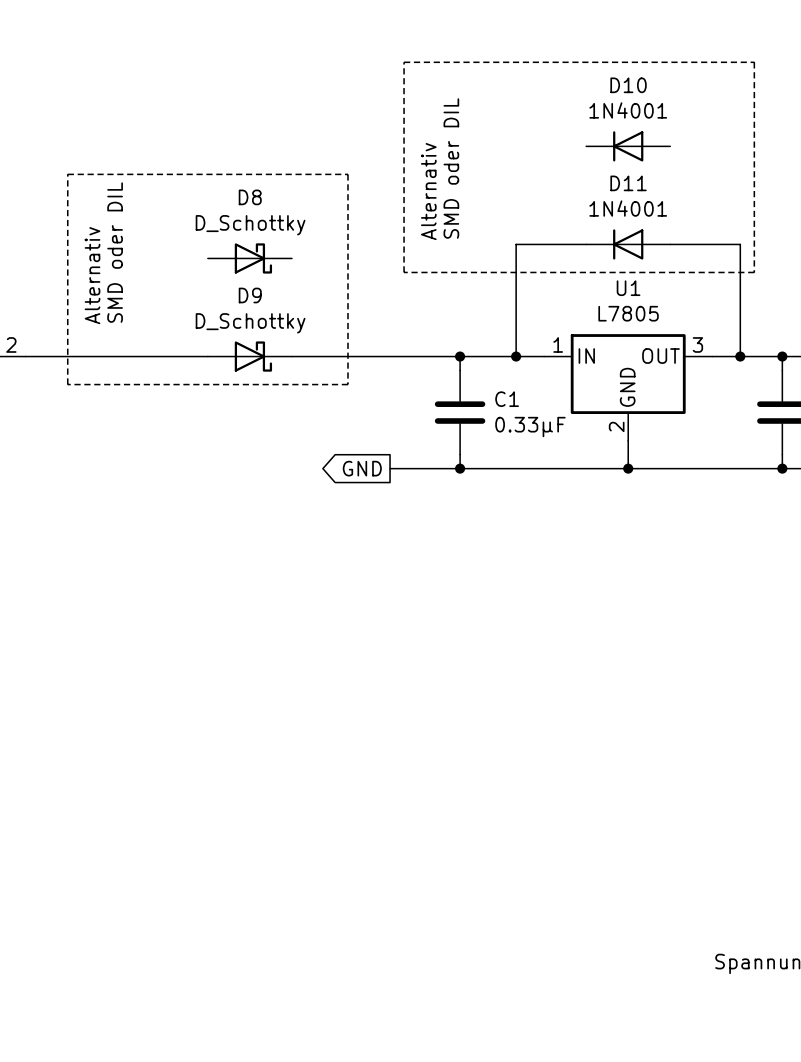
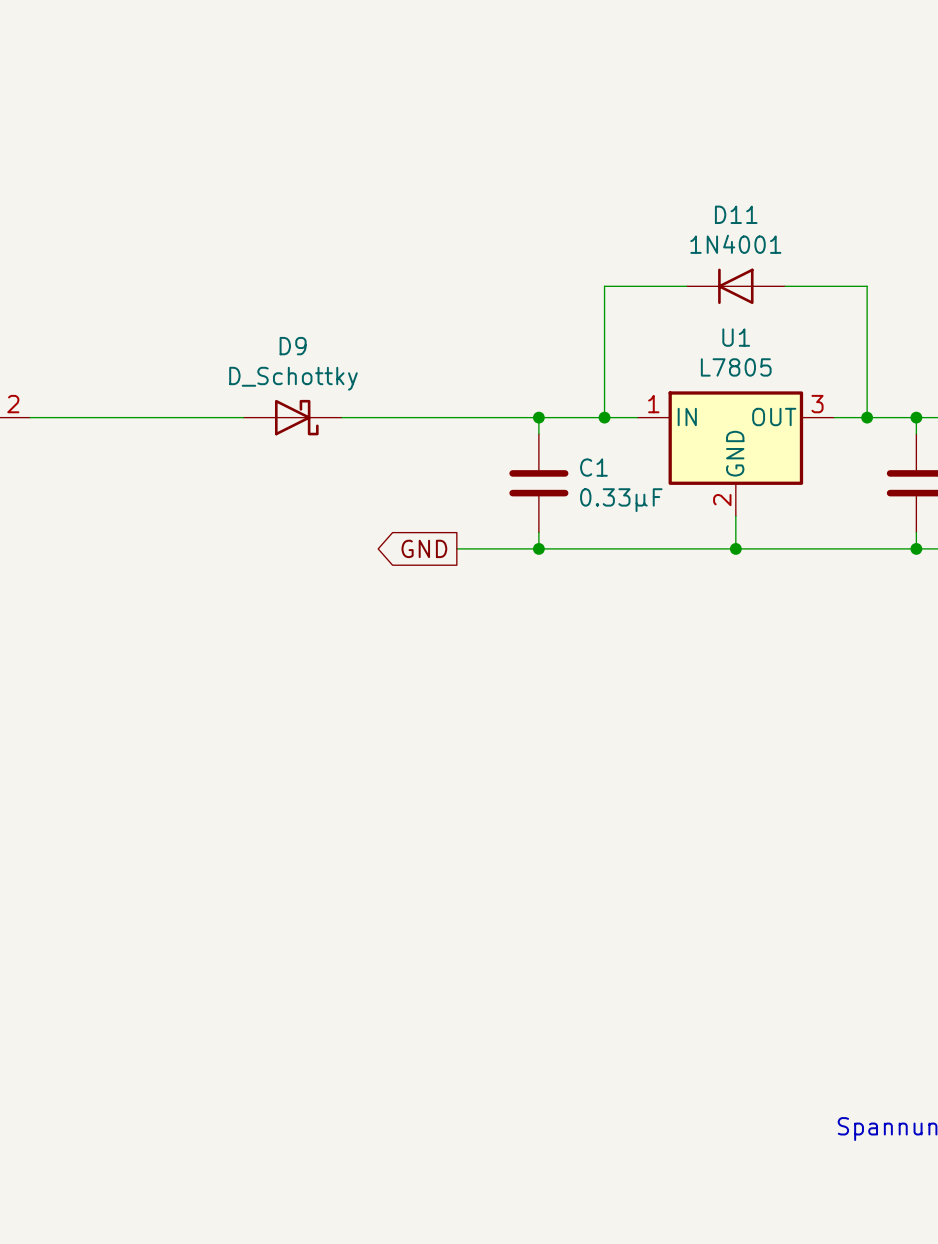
line: (404, 62) (754, 62) (754, 272) (404, 272) (404, 62) -> none
D10: 1N4001 (628, 146) -> none
text: SMD oder DIL (451, 168) -> none
line: (67, 174) (347, 174) (347, 384) (67, 384) (67, 174) -> none
text: Alternativ (428, 191) -> none
text: SMD oder DIL (115, 252) -> none
D8: D_Schottky (249, 258) -> none
text: Alternativ (92, 275) -> none

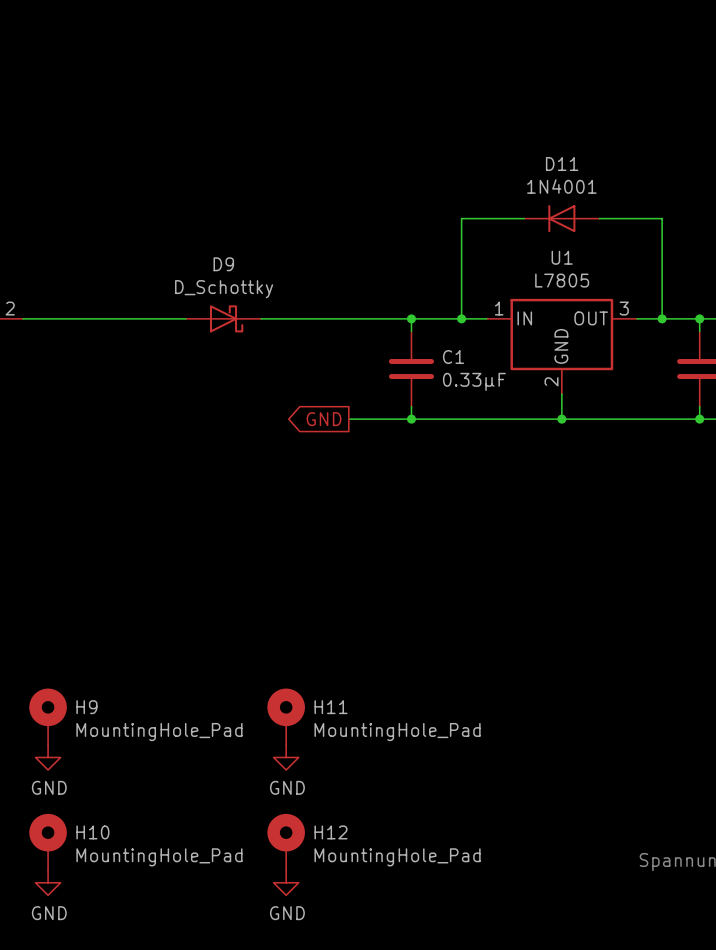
H9: none -> MountingHole_Pad (48, 716)
H11: none -> MountingHole_Pad (286, 716)
power symbol: none -> GND (48, 757)
power symbol: none -> GND (286, 757)
H10: none -> MountingHole_Pad (48, 842)
H12: none -> MountingHole_Pad (286, 842)
power symbol: none -> GND (48, 882)
power symbol: none -> GND (286, 882)

